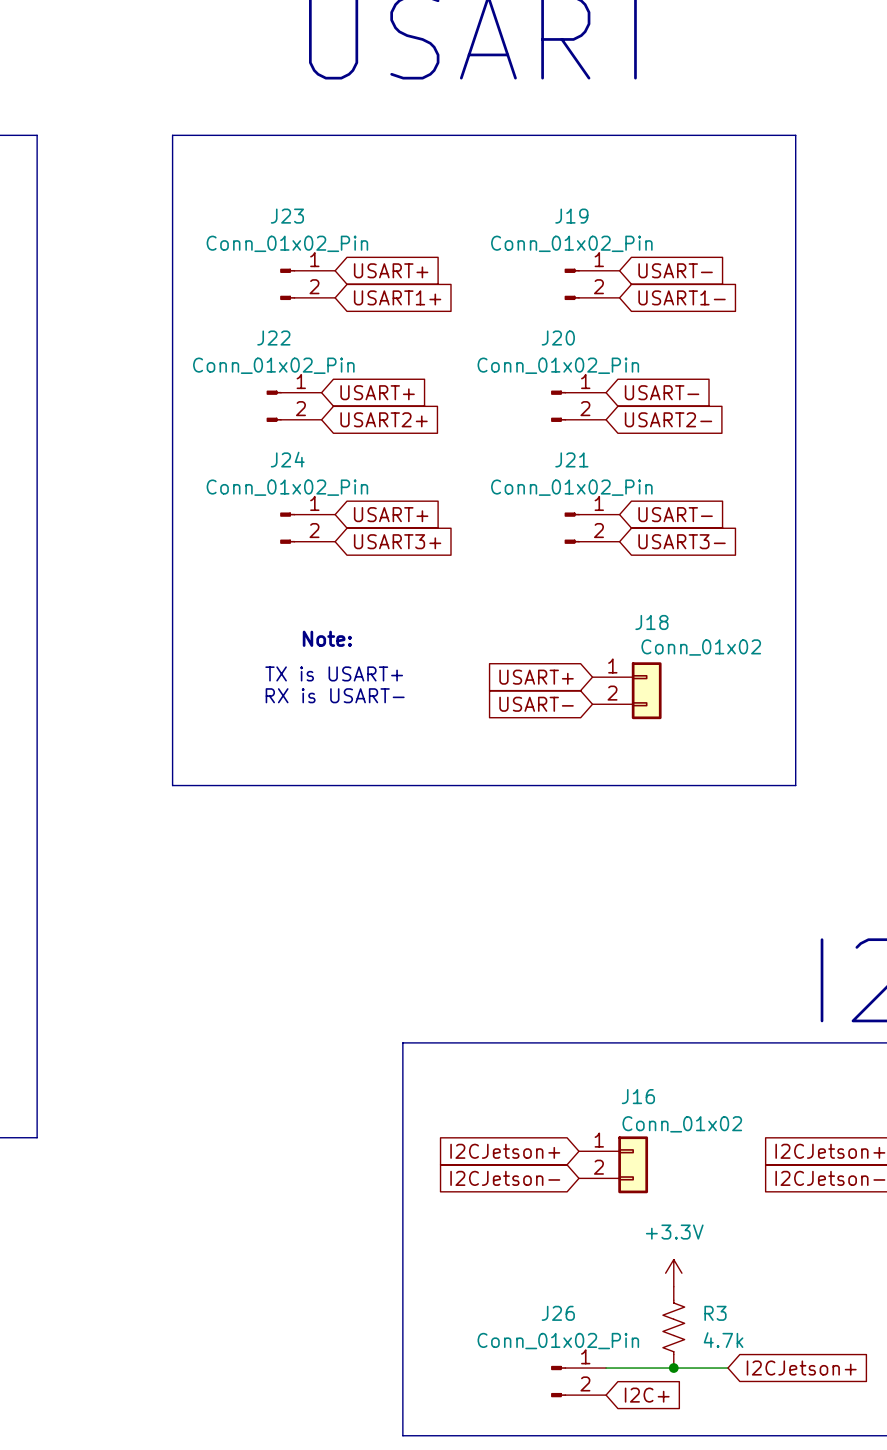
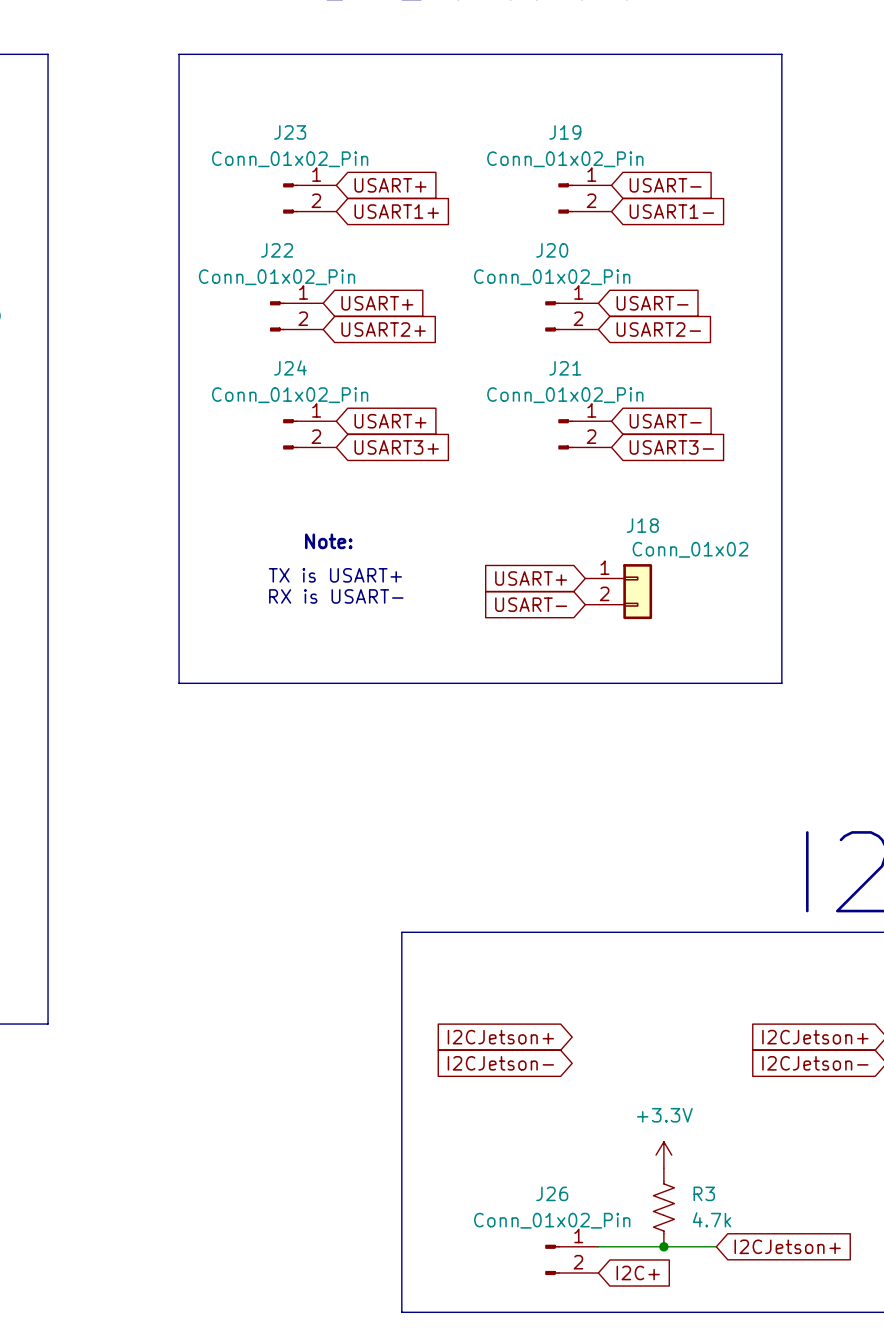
J16: Conn_01x02 (613, 1164) -> none

